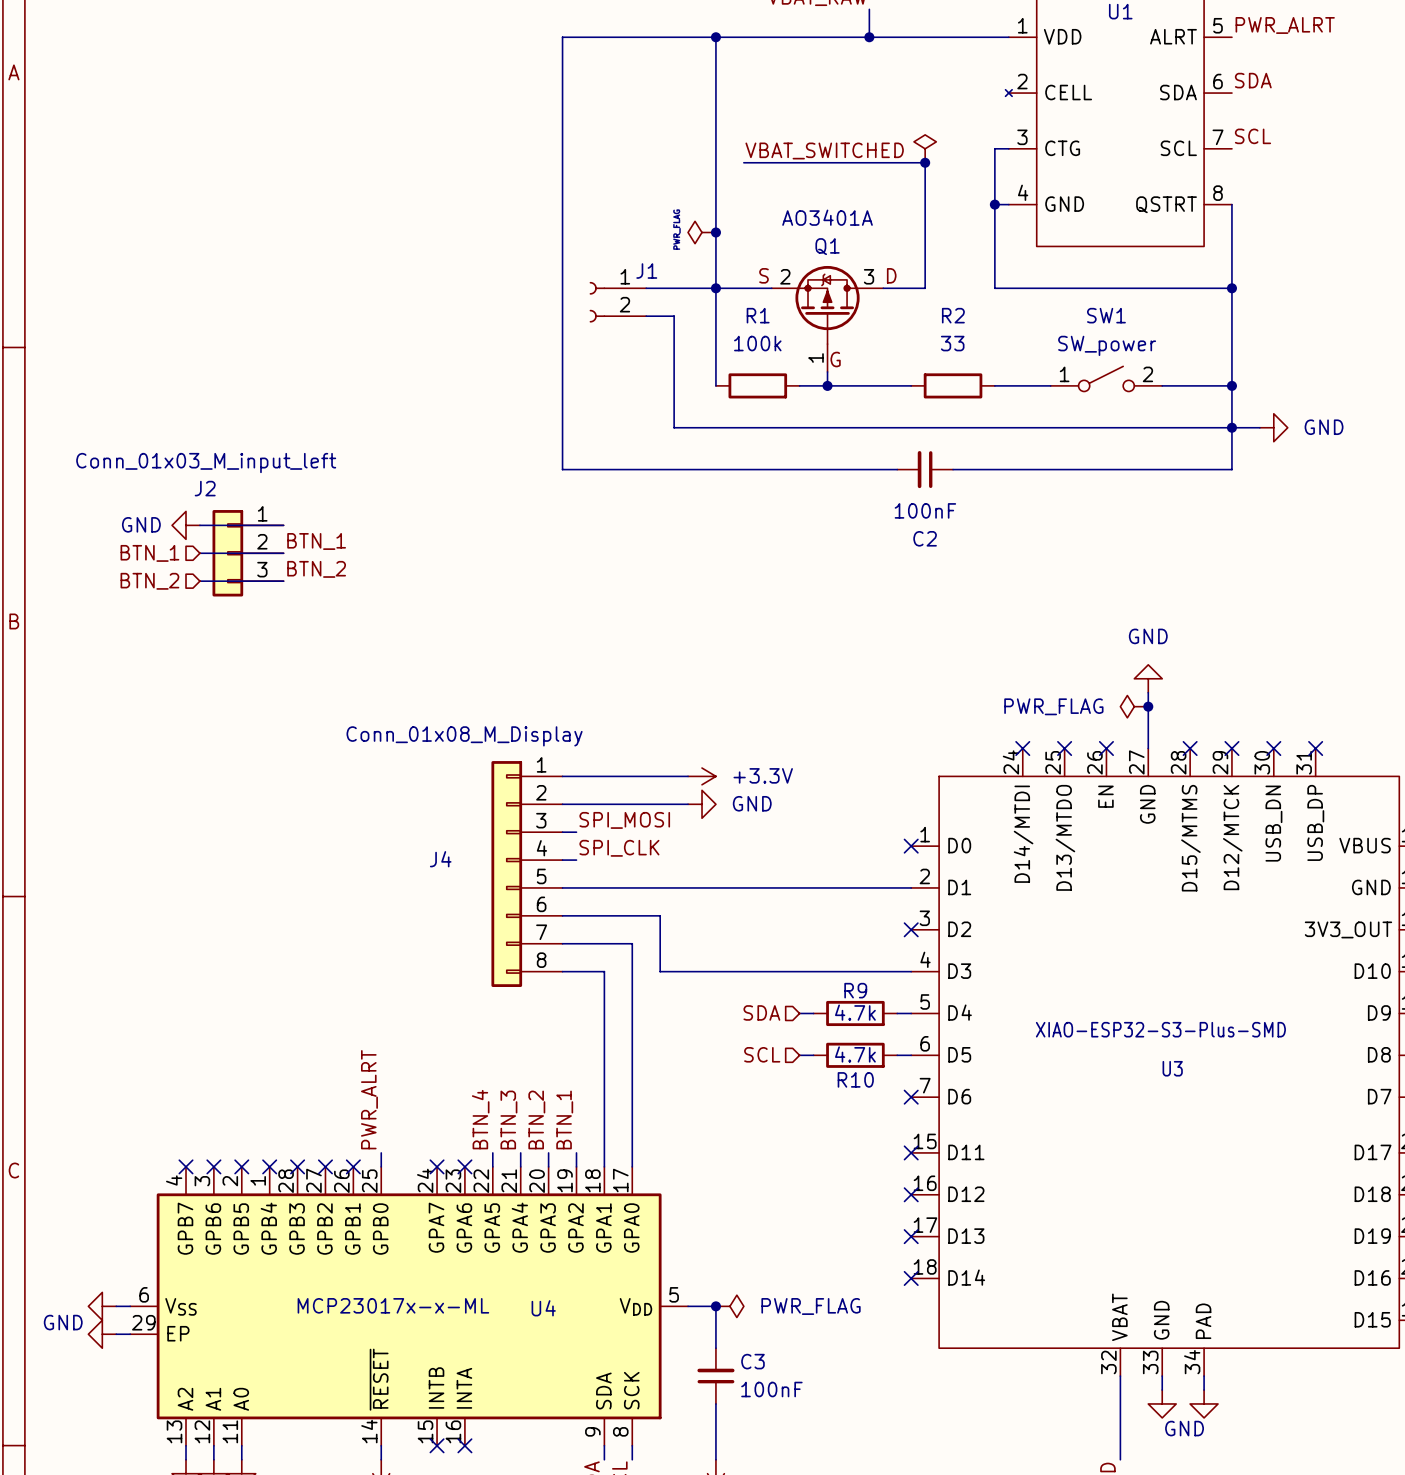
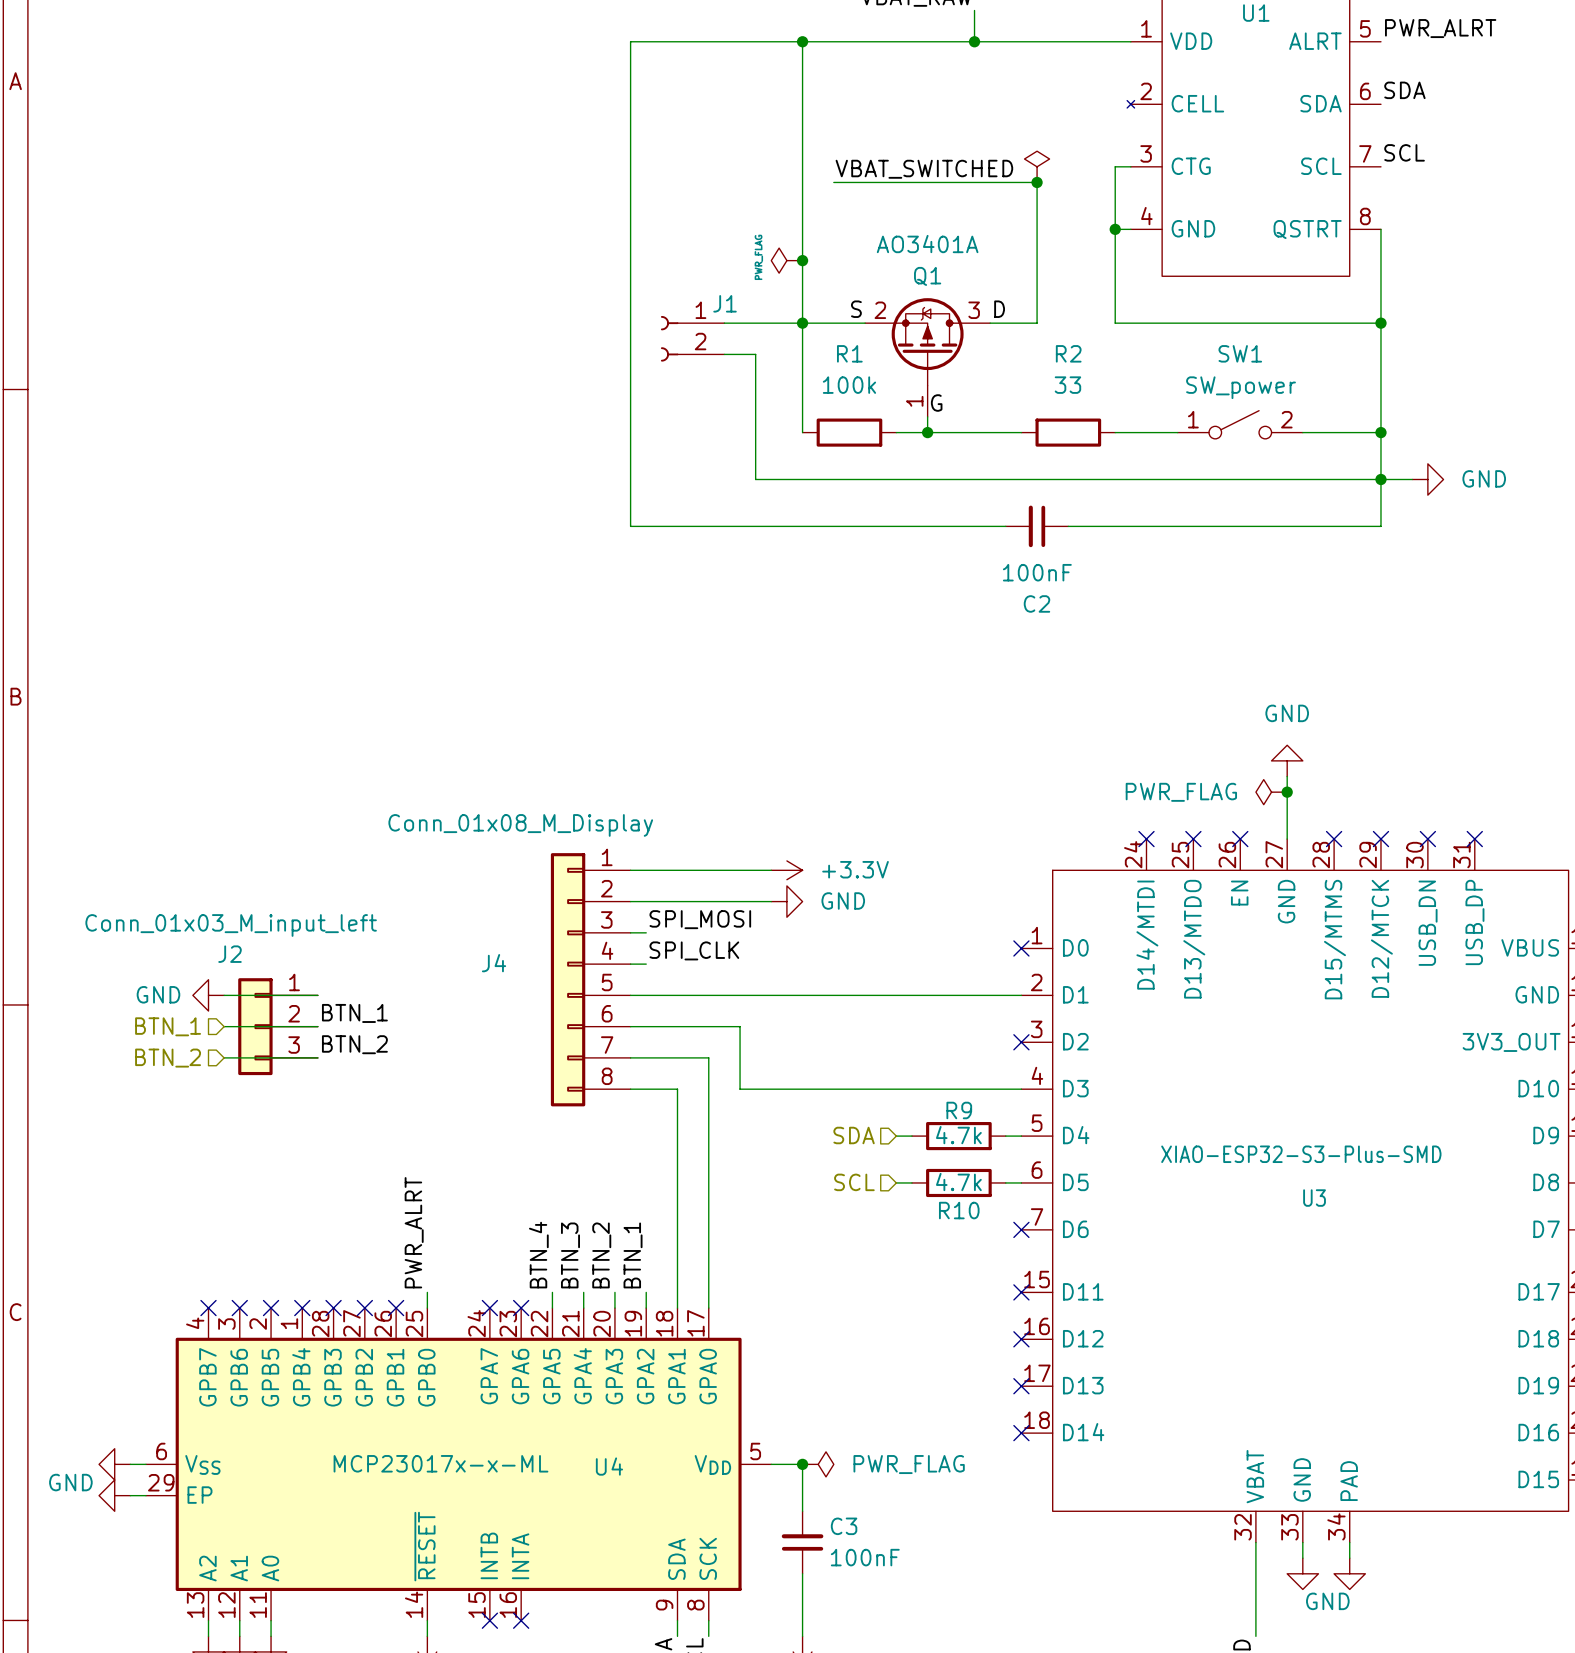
power symbol: GND (186, 525) -> none
wire: (199, 525) (283, 525) -> none
label: BTN_1 (316, 541) -> none
hierarchical label: BTN_1 (149, 553) -> none
wire: (199, 553) (283, 553) -> none
J2 position: (248, 553) -> (278, 1026)
label: BTN_2 (316, 569) -> none
hierarchical label: BTN_2 (149, 581) -> none
wire: (199, 581) (283, 581) -> none
power symbol: none -> GND (208, 995)
wire: none -> (224, 995) (317, 995)
label: none -> BTN_1 (354, 1013)
wire: none -> (224, 1026) (317, 1026)
hierarchical label: none -> BTN_1 (168, 1026)
label: none -> BTN_2 (354, 1044)
hierarchical label: none -> BTN_2 (168, 1058)
wire: none -> (224, 1057) (317, 1057)

